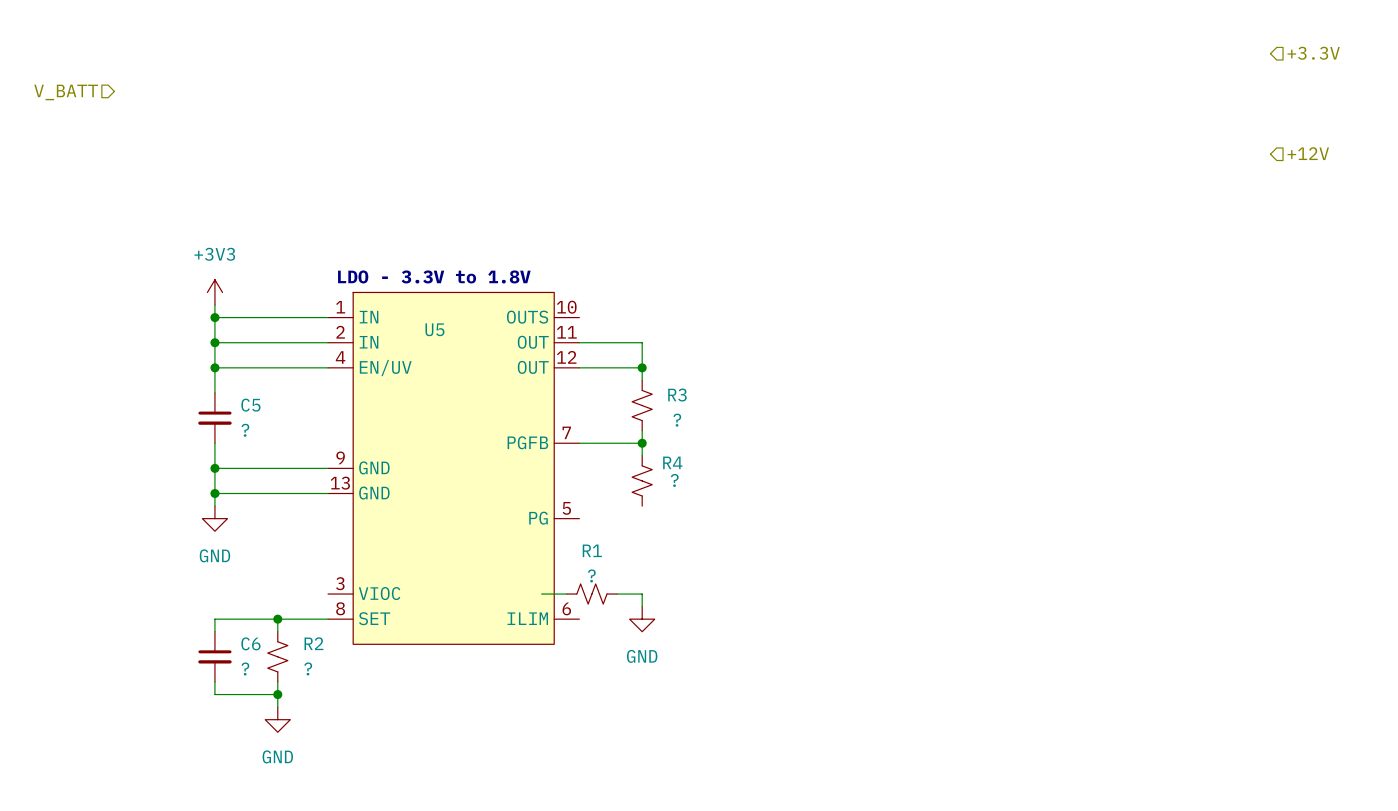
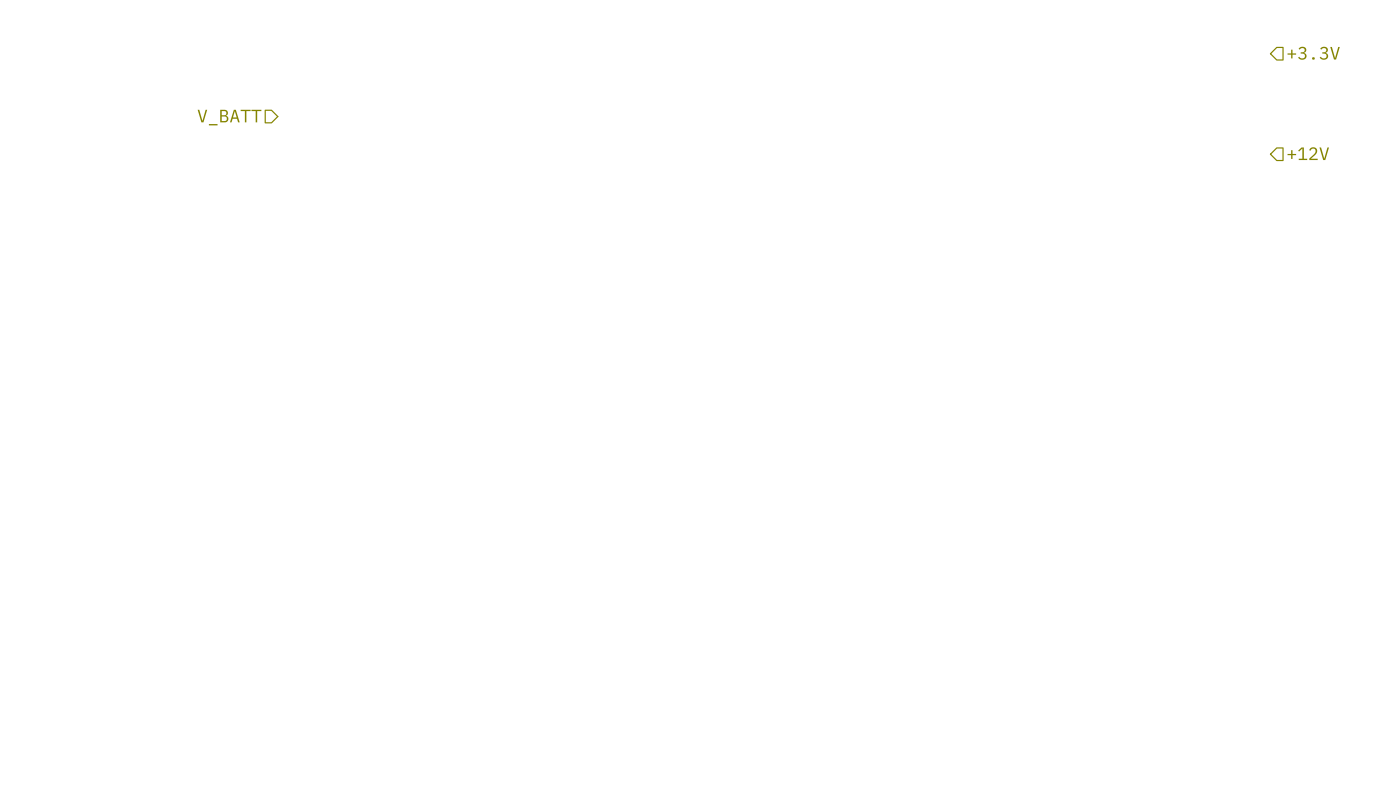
hierarchical label position: V_BATT (66, 92) -> V_BATT (229, 117)
text: LDO - 3.3V to 1.8V (434, 276) -> none
power symbol: +3V3 (214, 292) -> none
wire: (214, 305) (214, 392) -> none
wire: (214, 317) (328, 317) -> none
junction: (214, 317) -> none
wire: (214, 342) (328, 342) -> none
junction: (214, 342) -> none
wire: (579, 342) (642, 342) (642, 380) -> none
wire: (214, 367) (328, 367) -> none
junction: (214, 367) -> none
wire: (579, 367) (642, 367) -> none
junction: (642, 367) -> none
R3: ? (642, 405) -> none
C5: ? (214, 418) -> none
wire: (642, 430) (642, 455) -> none
wire: (214, 443) (214, 506) -> none
wire: (579, 443) (642, 443) -> none
junction: (642, 443) -> none
wire: (214, 468) (328, 468) -> none
junction: (214, 468) -> none
U5: (453, 468) -> none
R4: ? (642, 480) -> none
wire: (214, 493) (328, 493) -> none
junction: (214, 493) -> none
power symbol: GND (214, 518) -> none
wire: (541, 594) (566, 594) -> none
R1: ? (591, 594) -> none
wire: (617, 594) (642, 594) (642, 606) -> none
wire: (277, 619) (277, 631) -> none
junction: (277, 619) -> none
wire: (328, 619) (214, 619) (214, 631) -> none
power symbol: GND (642, 619) -> none
C6: ? (214, 656) -> none
R2: ? (277, 656) -> none
wire: (214, 681) (214, 694) (277, 694) -> none
wire: (277, 681) (277, 707) -> none
junction: (277, 694) -> none
power symbol: GND (277, 719) -> none

